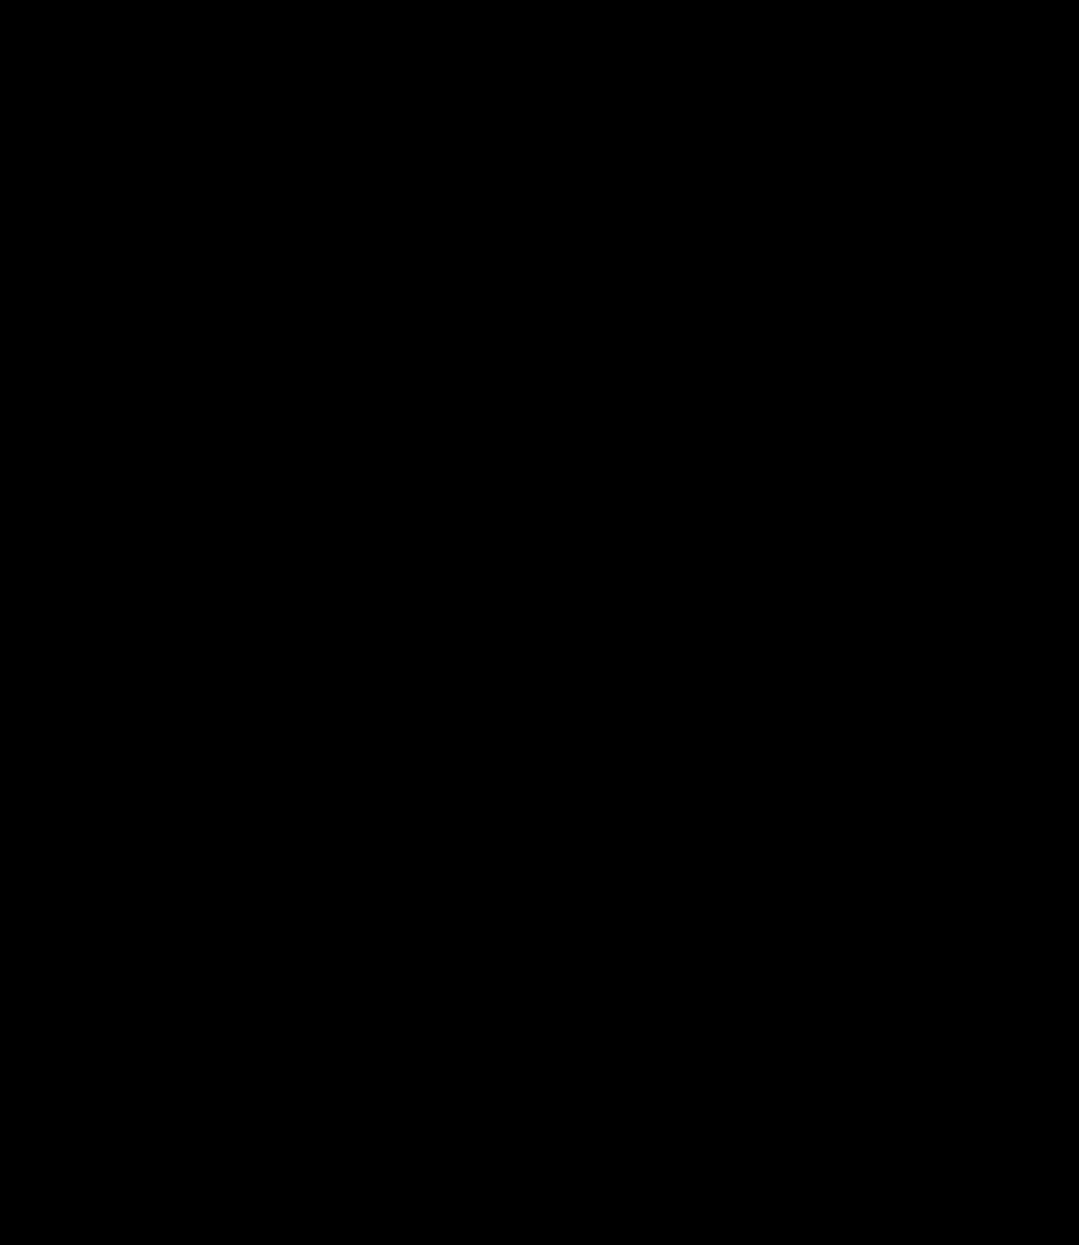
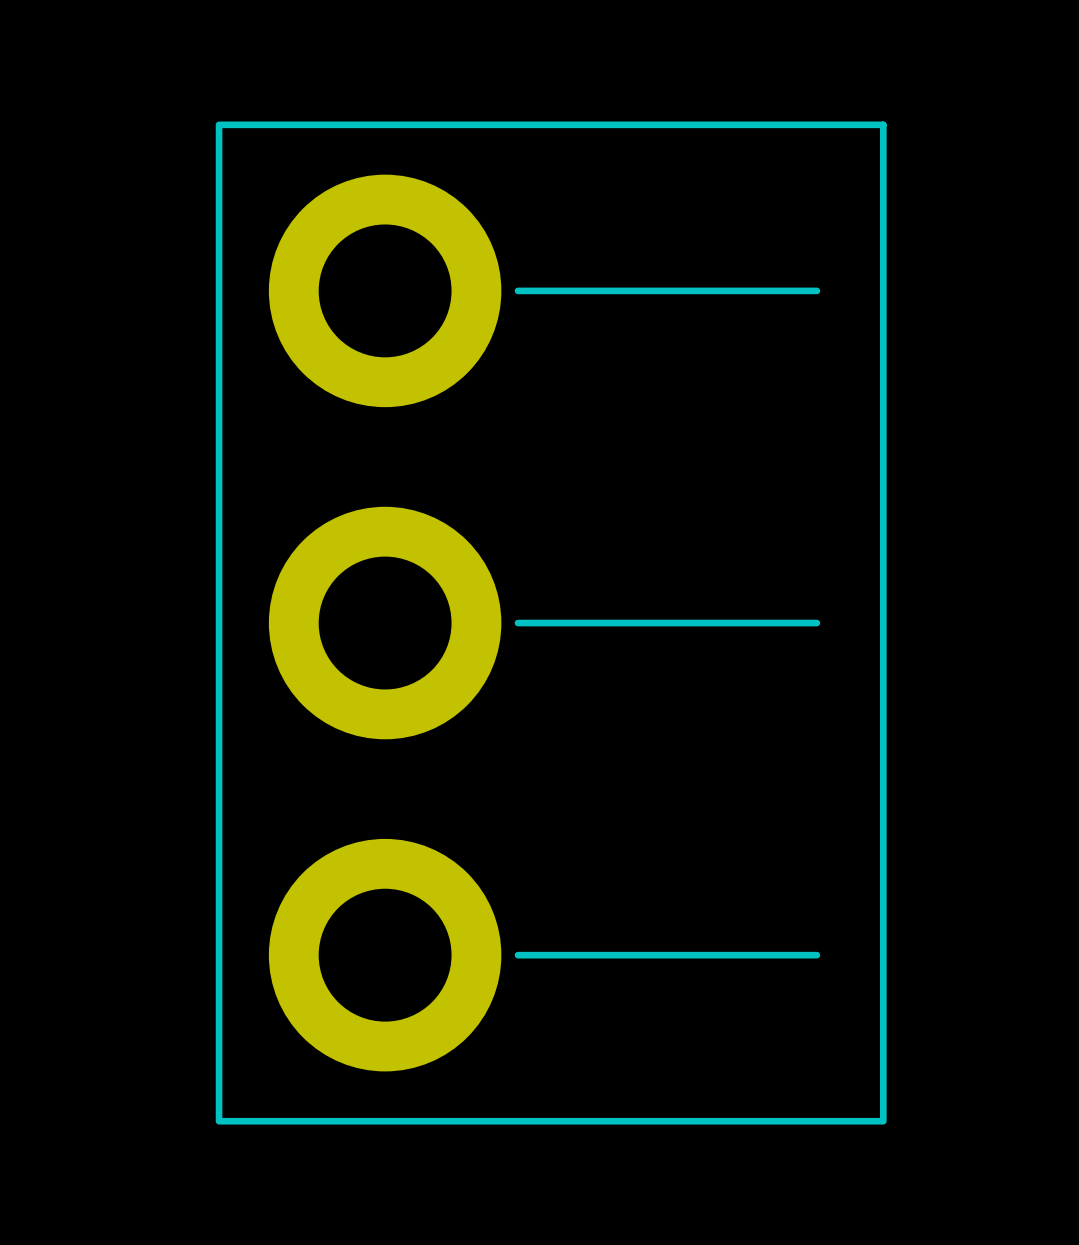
part: none -> (551, 623)

